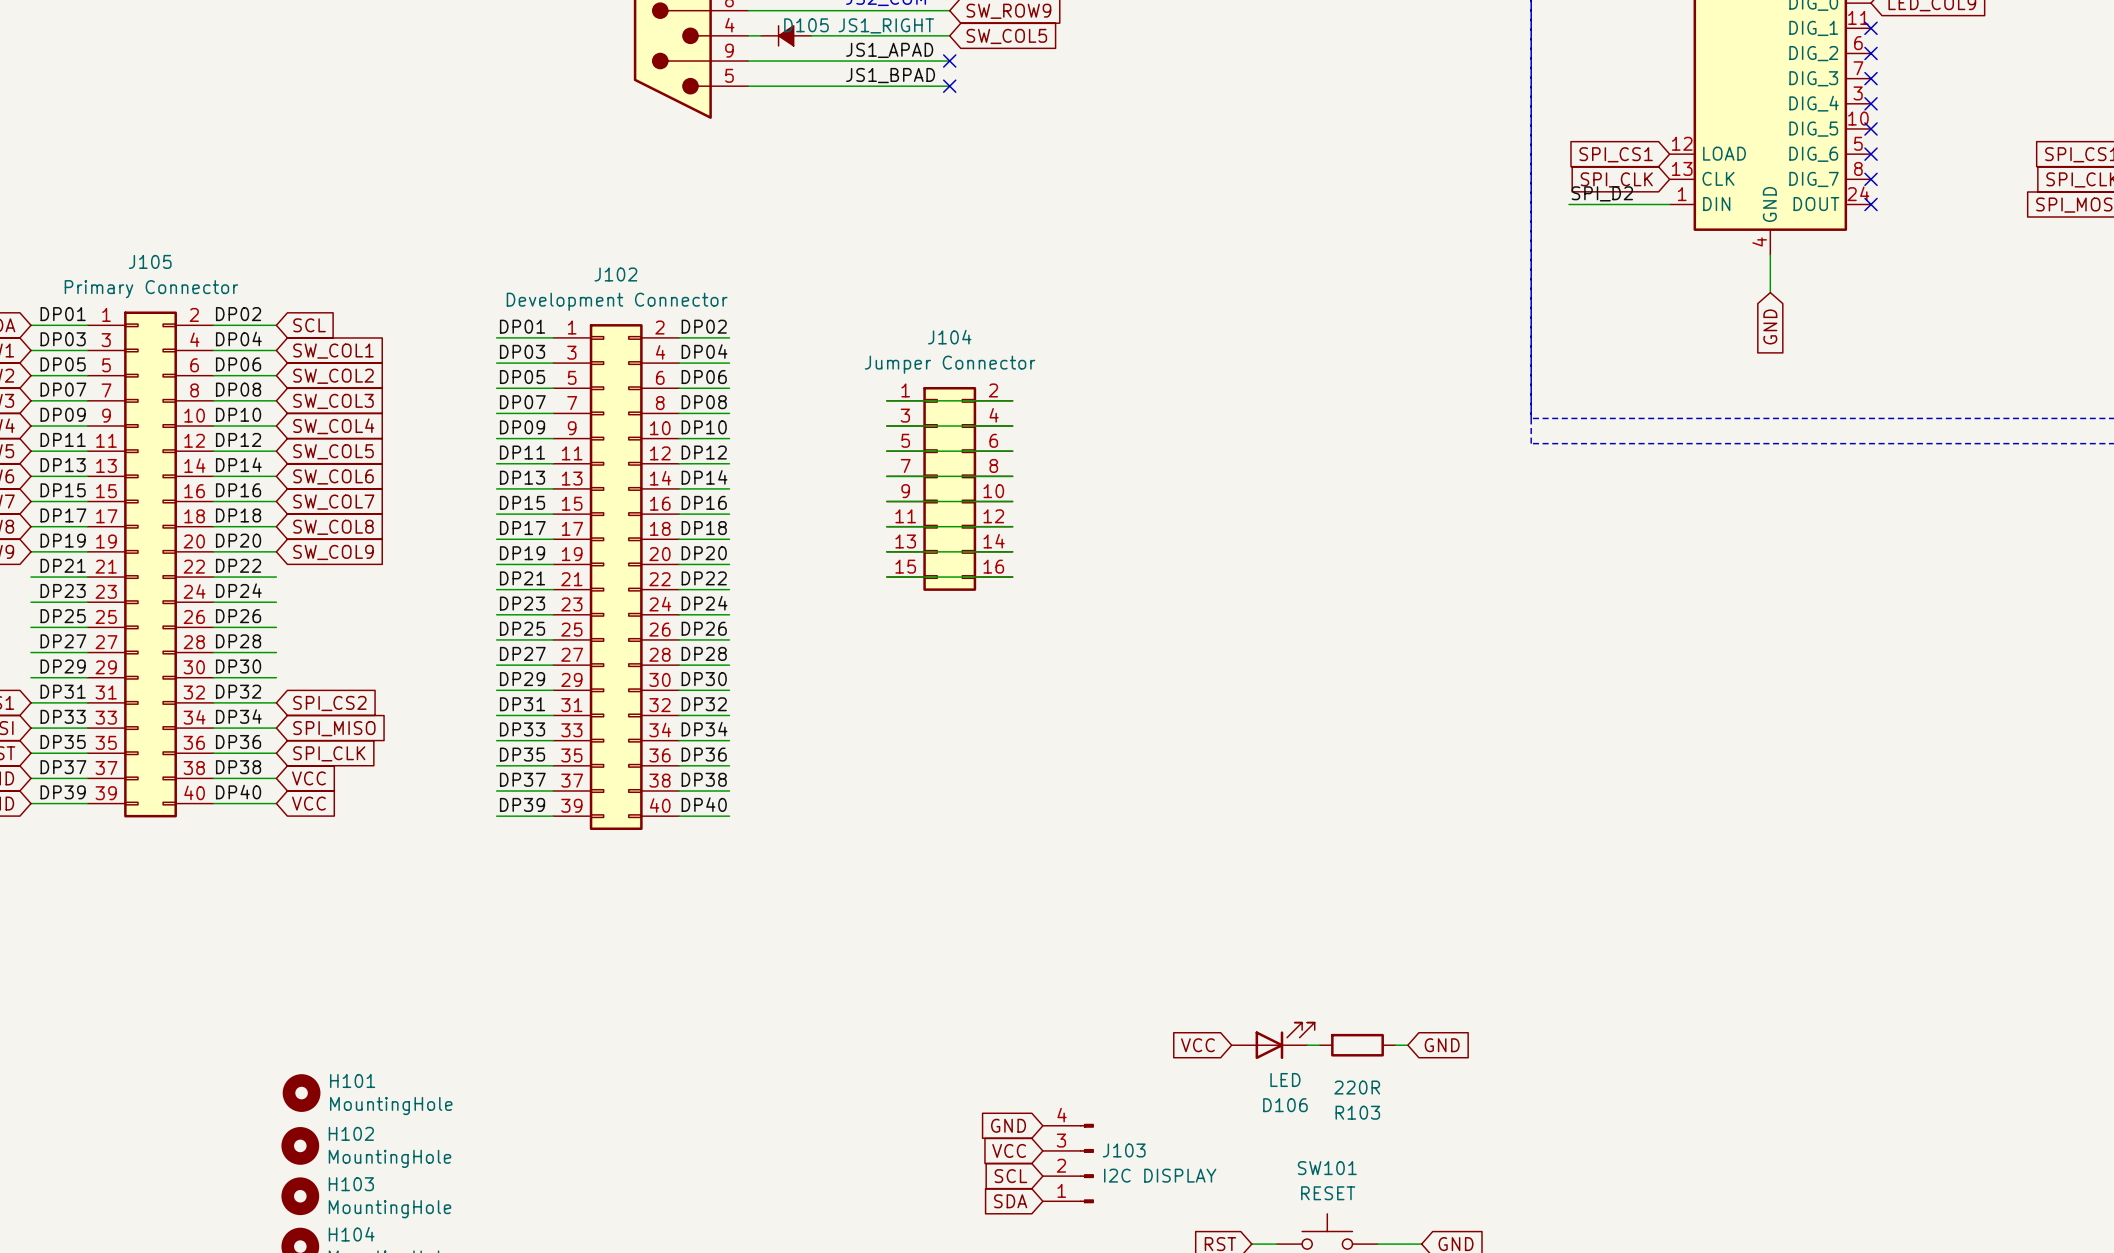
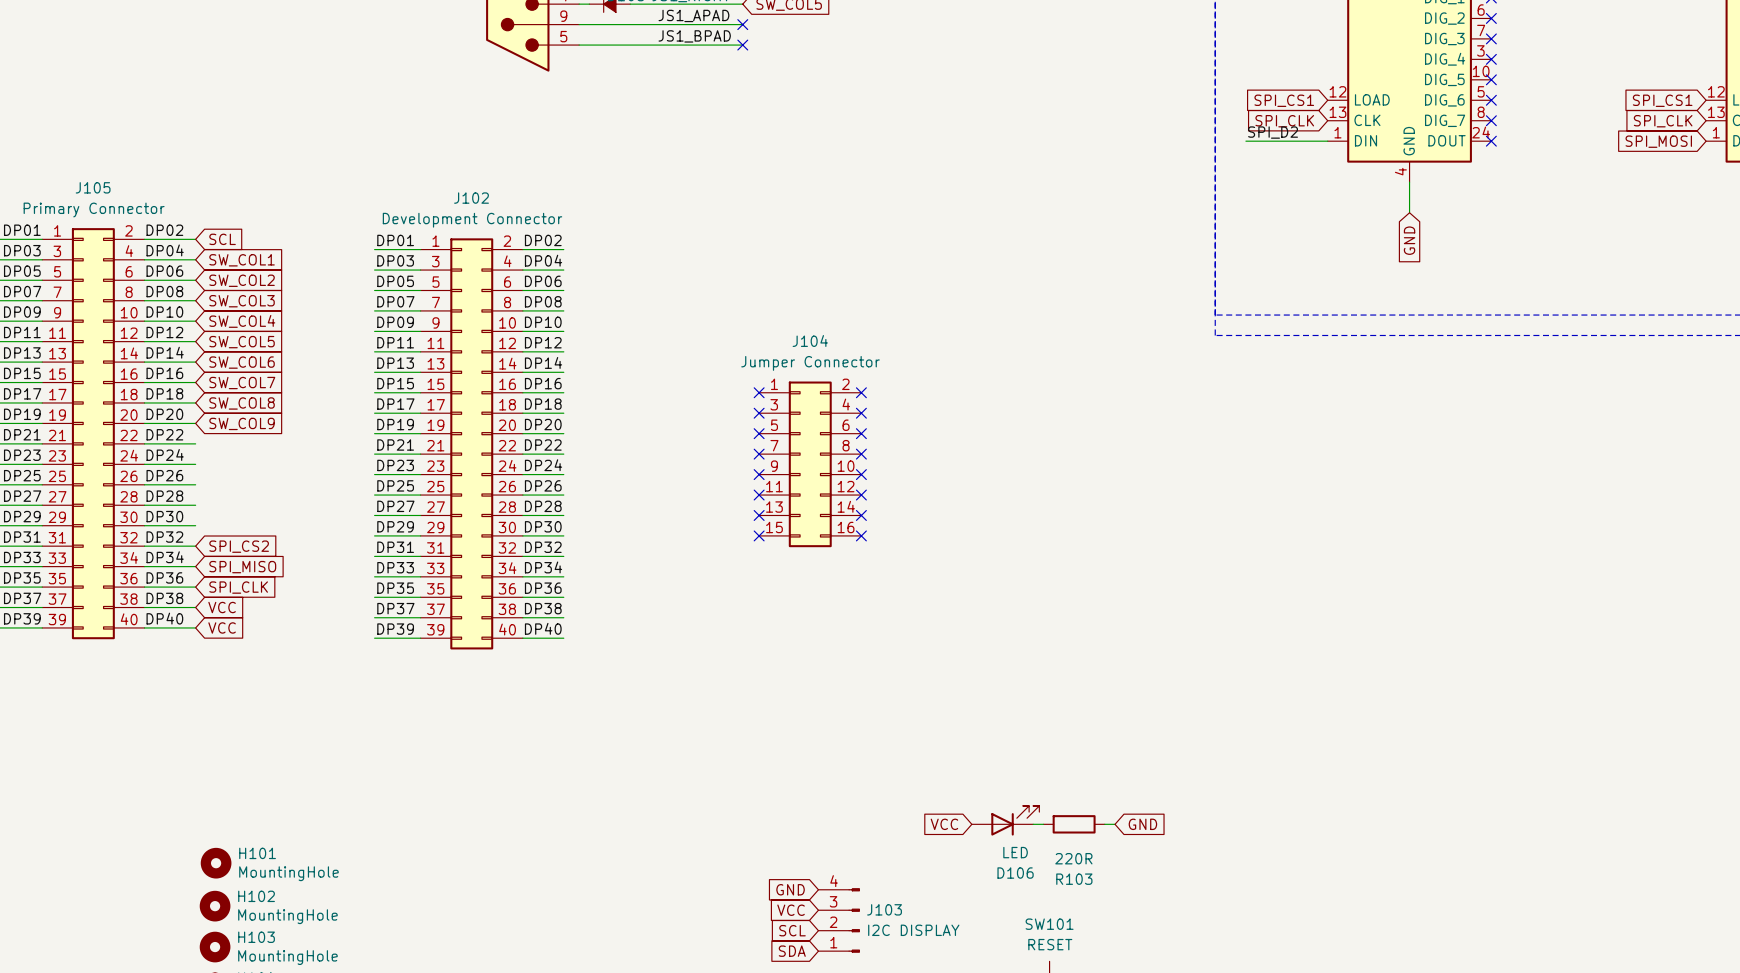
wire: (886, 400) (1012, 400) -> none
wire: (886, 426) (1012, 426) -> none
wire: (886, 451) (1012, 451) -> none
wire: (886, 476) (1012, 476) -> none
J104 position: (949, 488) -> (810, 464)
wire: (886, 501) (1012, 501) -> none
no-connect mark: none -> (759, 392)
no-connect mark: none -> (861, 392)
wire: (886, 526) (1012, 526) -> none
no-connect mark: none -> (759, 413)
no-connect mark: none -> (861, 413)
wire: (886, 551) (1012, 551) -> none
no-connect mark: none -> (759, 433)
no-connect mark: none -> (861, 433)
wire: (886, 577) (1012, 577) -> none
no-connect mark: none -> (759, 454)
no-connect mark: none -> (861, 454)
no-connect mark: none -> (759, 474)
no-connect mark: none -> (861, 474)
no-connect mark: none -> (759, 495)
no-connect mark: none -> (861, 495)
no-connect mark: none -> (759, 515)
no-connect mark: none -> (861, 515)
no-connect mark: none -> (759, 535)
no-connect mark: none -> (861, 535)

